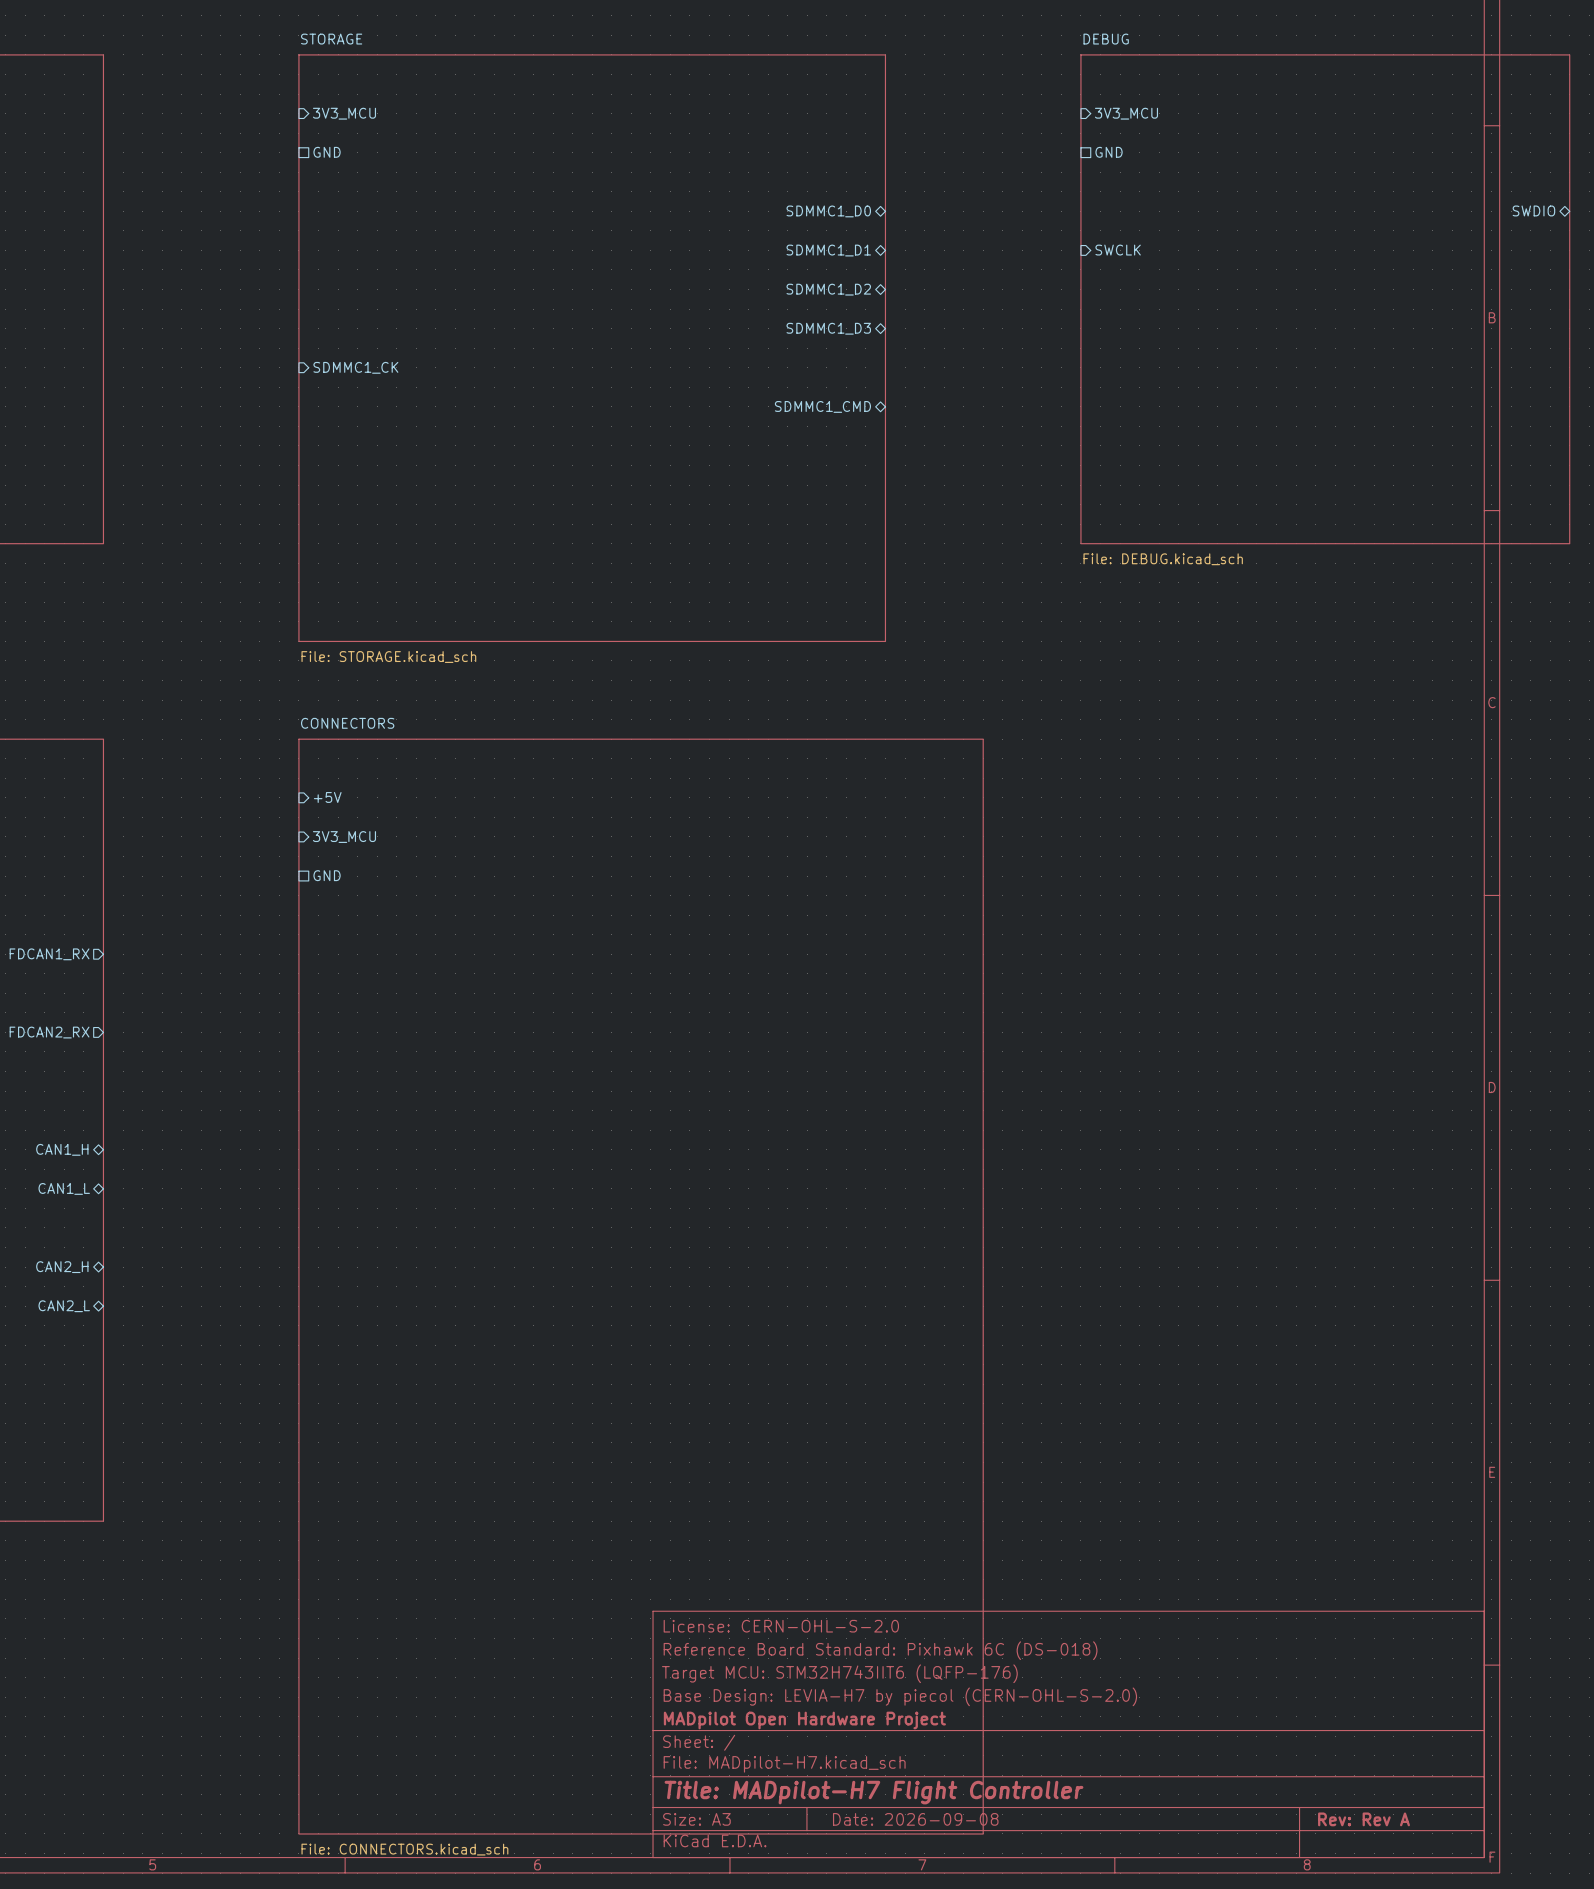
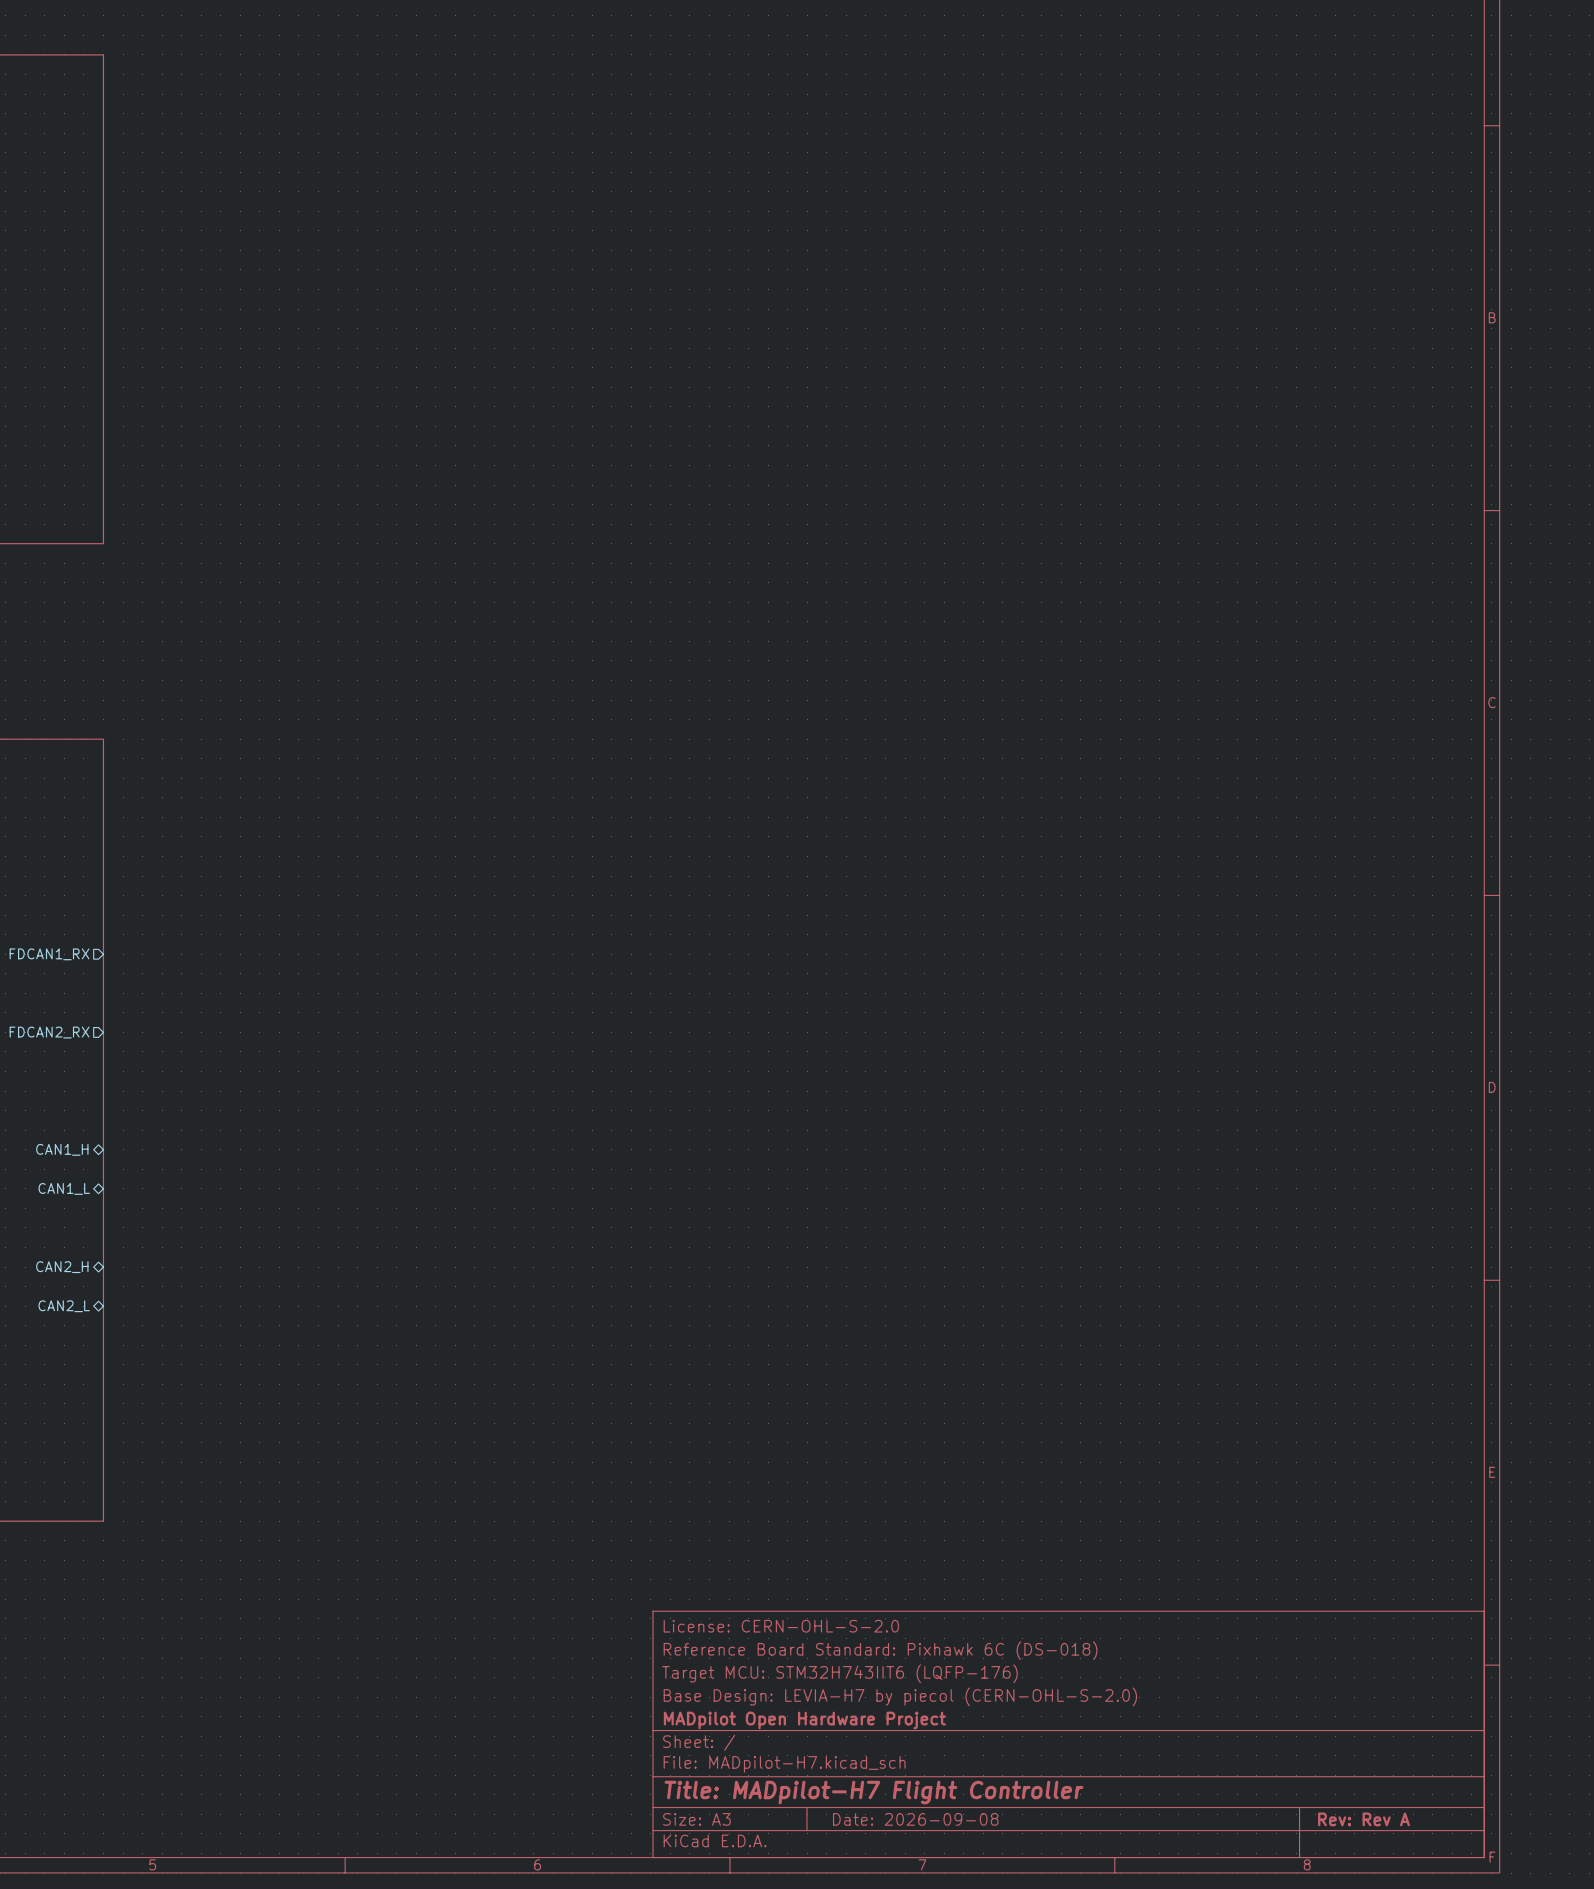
sheet pin: 3V3_MCU (344, 113) -> none
sheet pin: 3V3_MCU (1126, 113) -> none
sheet pin: GND (327, 152) -> none
sheet pin: GND (1109, 152) -> none
sheet pin: SWDIO (1533, 210) -> none
sheet pin: SDMMC1_D0 (828, 211) -> none
sheet pin: SDMMC1_D1 (828, 250) -> none
sheet pin: SWCLK (1118, 250) -> none
sheet pin: SDMMC1_D2 (828, 289) -> none
sheet DEBUG: File: DEBUG.kicad_sch (1325, 299) -> none
sheet pin: SDMMC1_D3 (828, 328) -> none
sheet STORAGE: File: STORAGE.kicad_sch (592, 348) -> none
sheet pin: SDMMC1_CK (355, 367) -> none
sheet pin: SDMMC1_CMD (822, 406) -> none
sheet pin: +5V (327, 797) -> none
sheet pin: 3V3_MCU (344, 837) -> none
sheet pin: GND (327, 875) -> none
sheet CONNECTORS: File: CONNECTORS.kicad_sch (641, 1286) -> none

